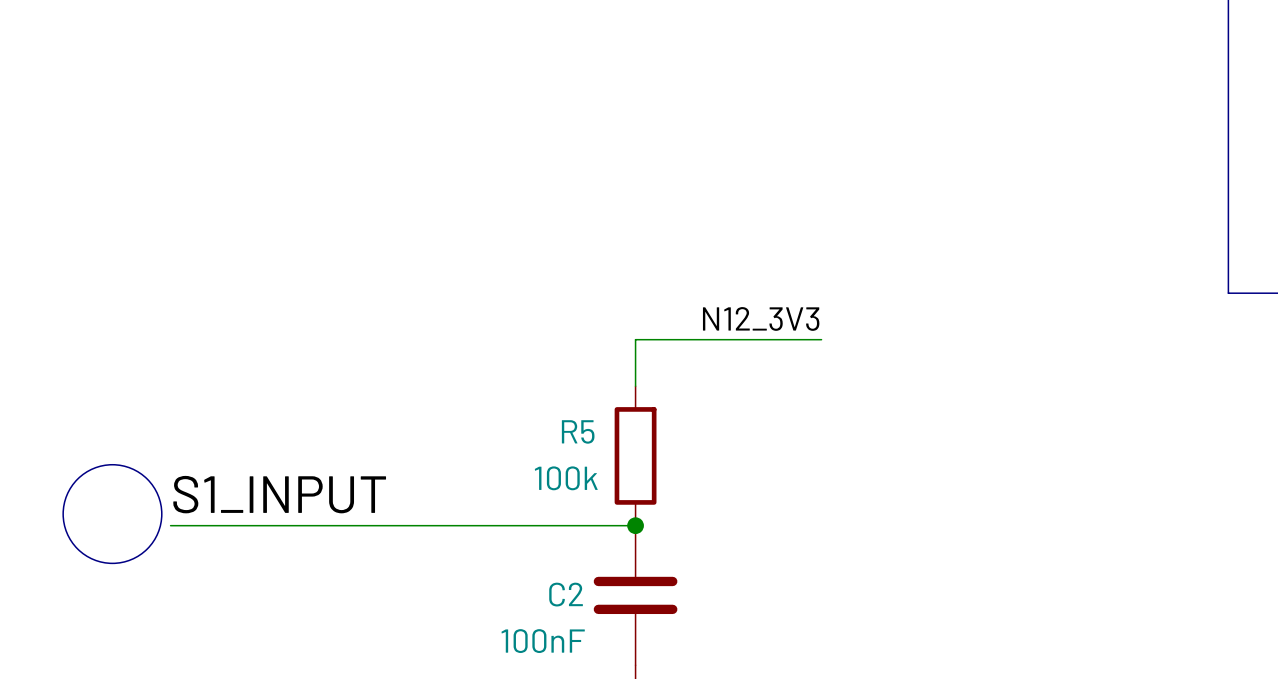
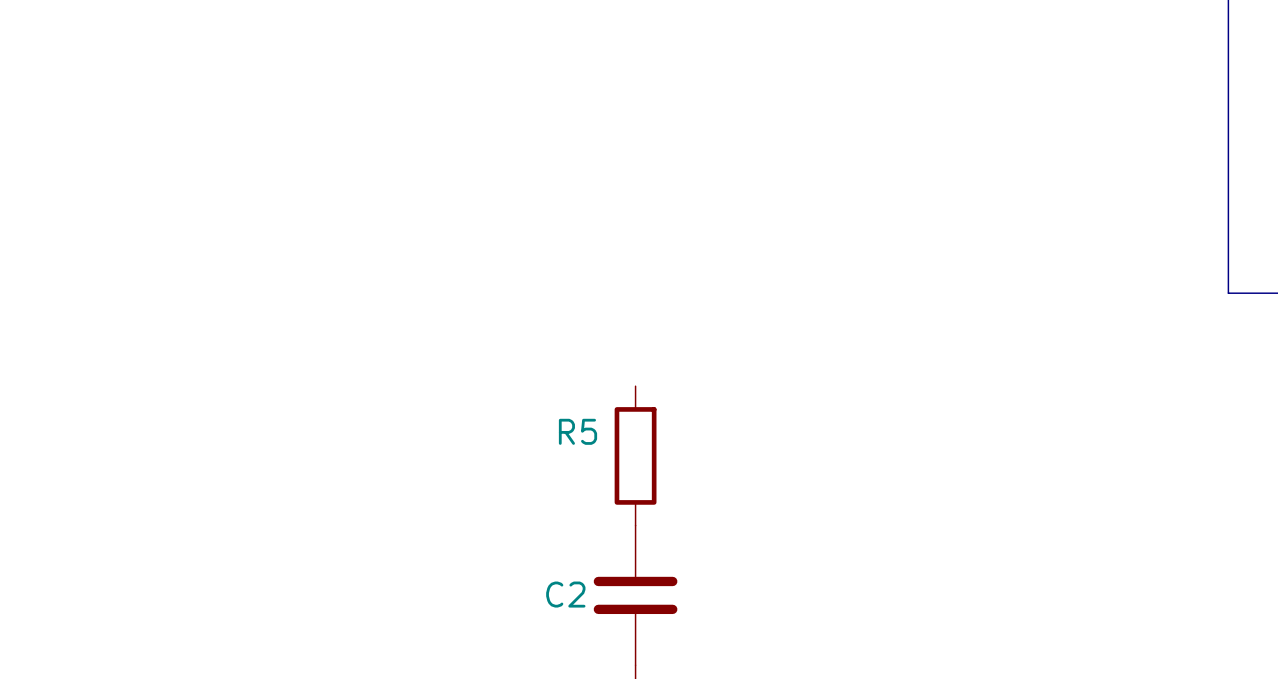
label: N12_3V3 (761, 318) -> none
wire: (821, 339) (635, 339) (635, 386) -> none
drawing: [63, 464, 162, 564] -> none
R5 value: 100k (566, 478) -> none
label: S1_INPUT (279, 494) -> none
wire: (170, 525) (635, 525) -> none
junction: (635, 525) -> none
C2 value: 100nF (543, 641) -> none

